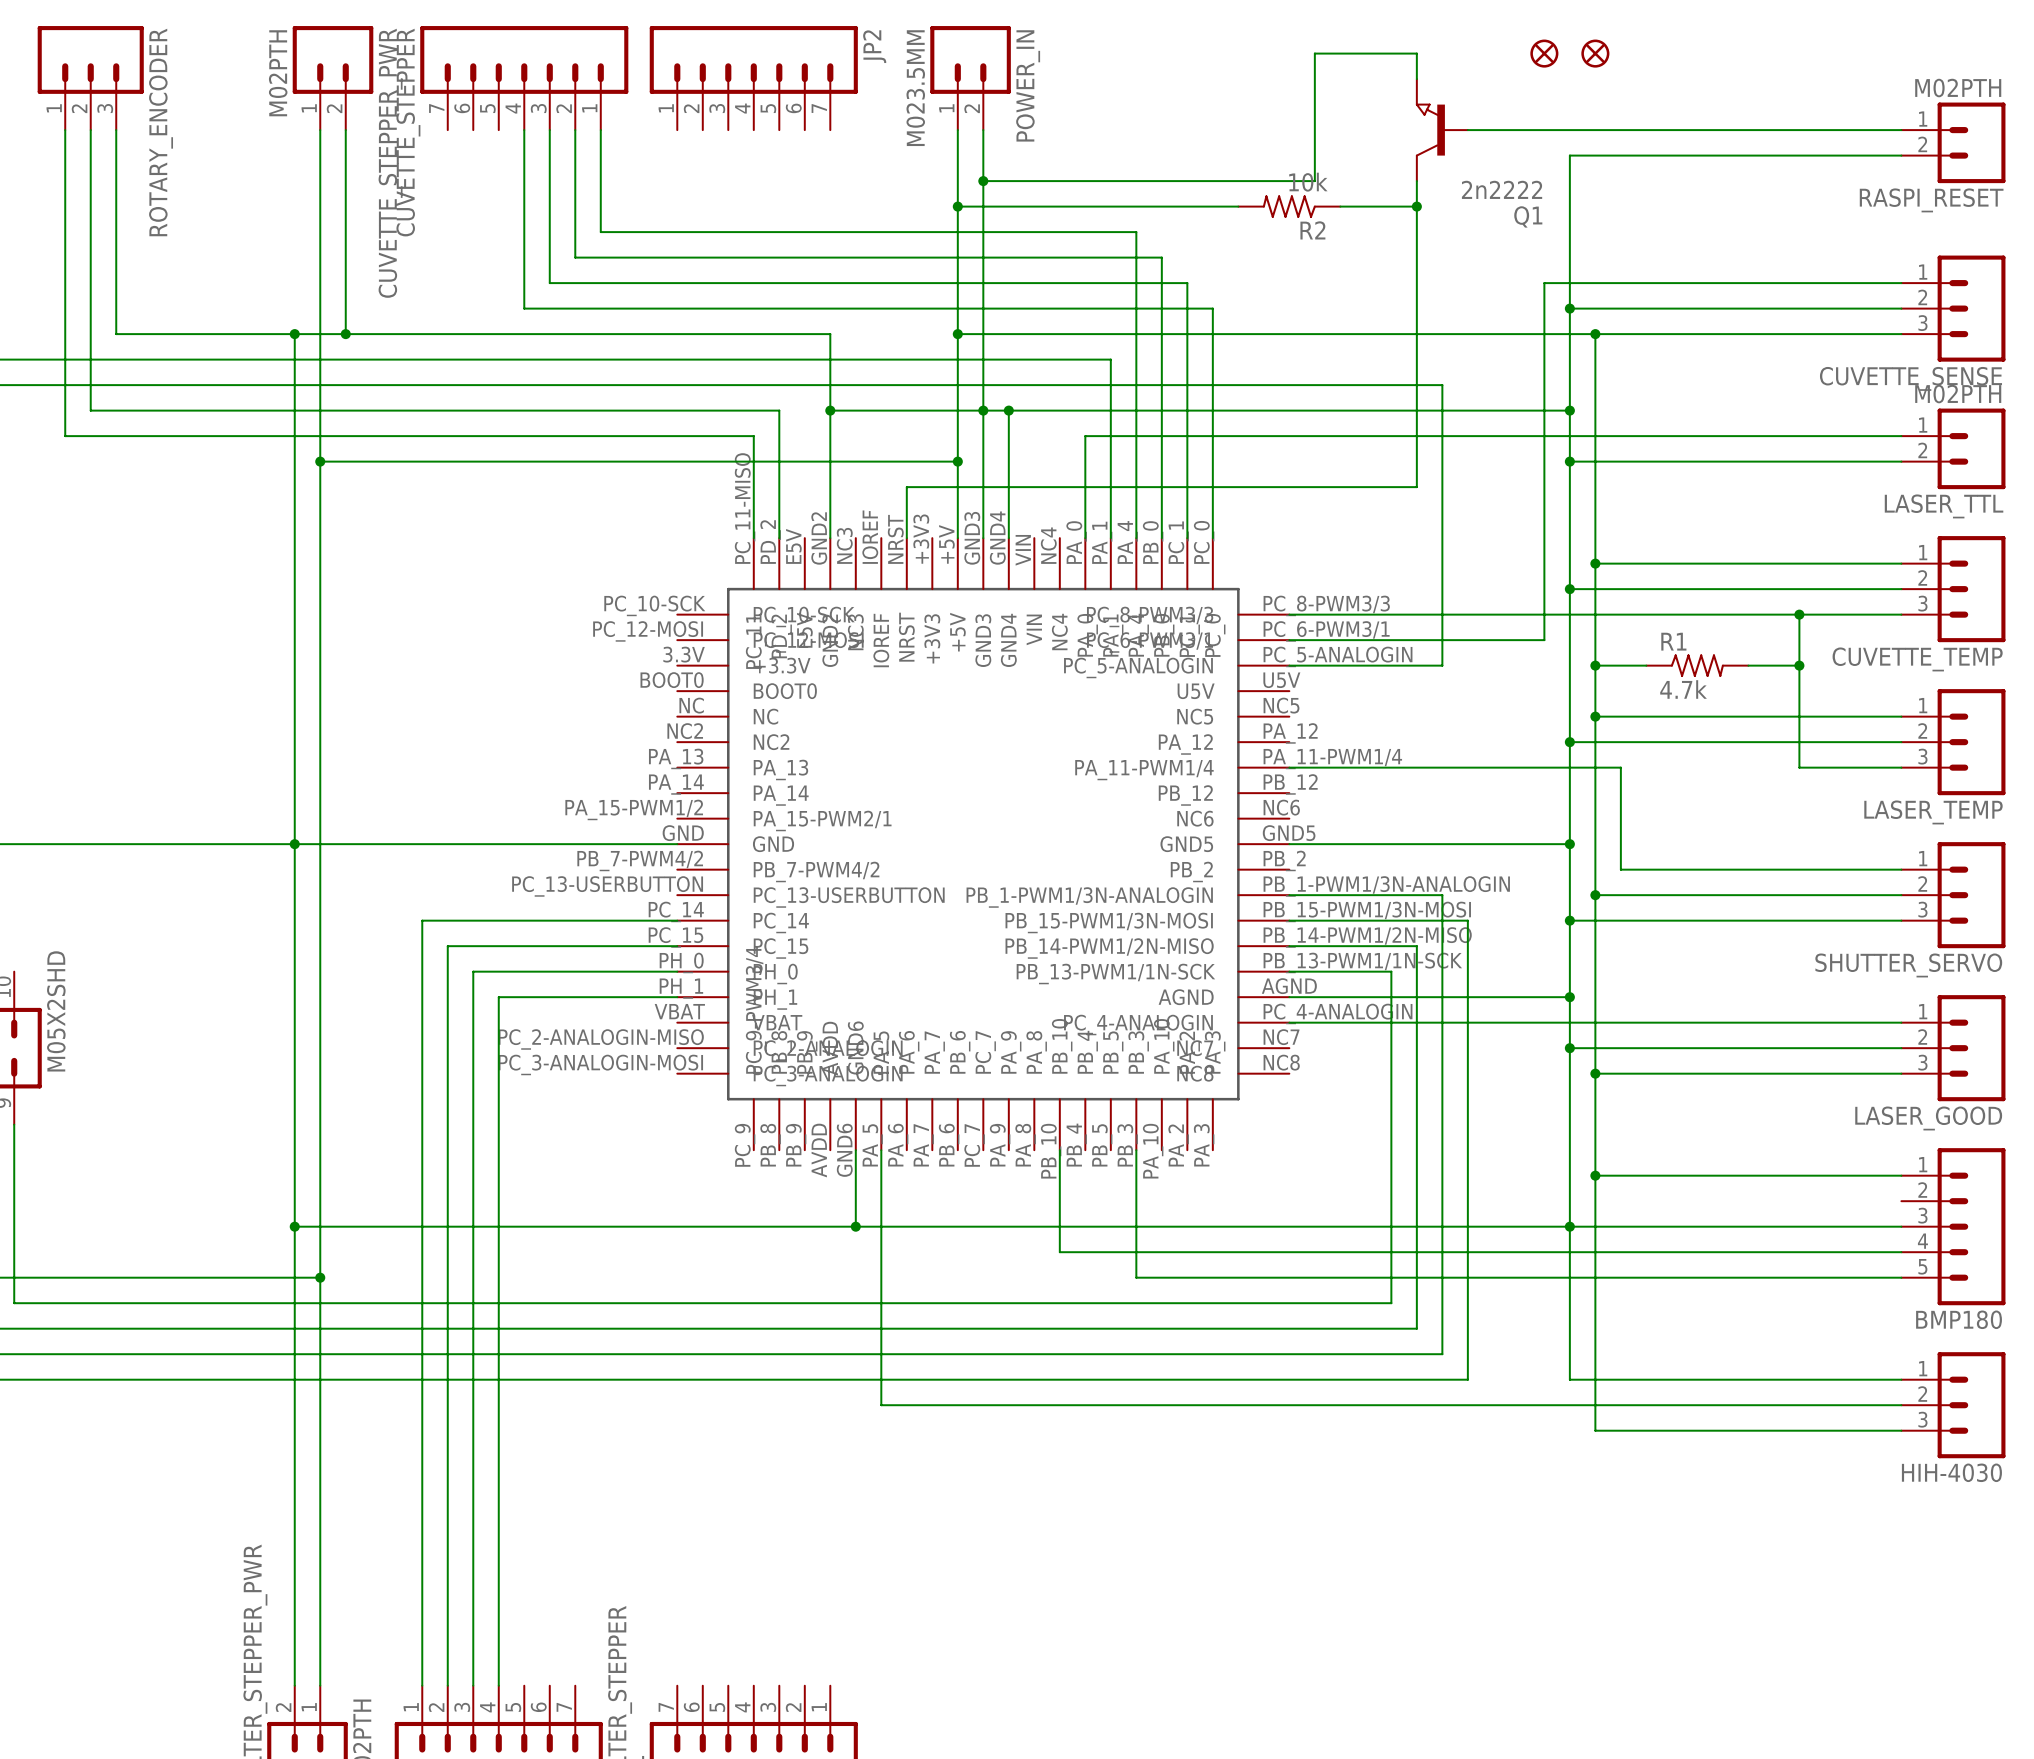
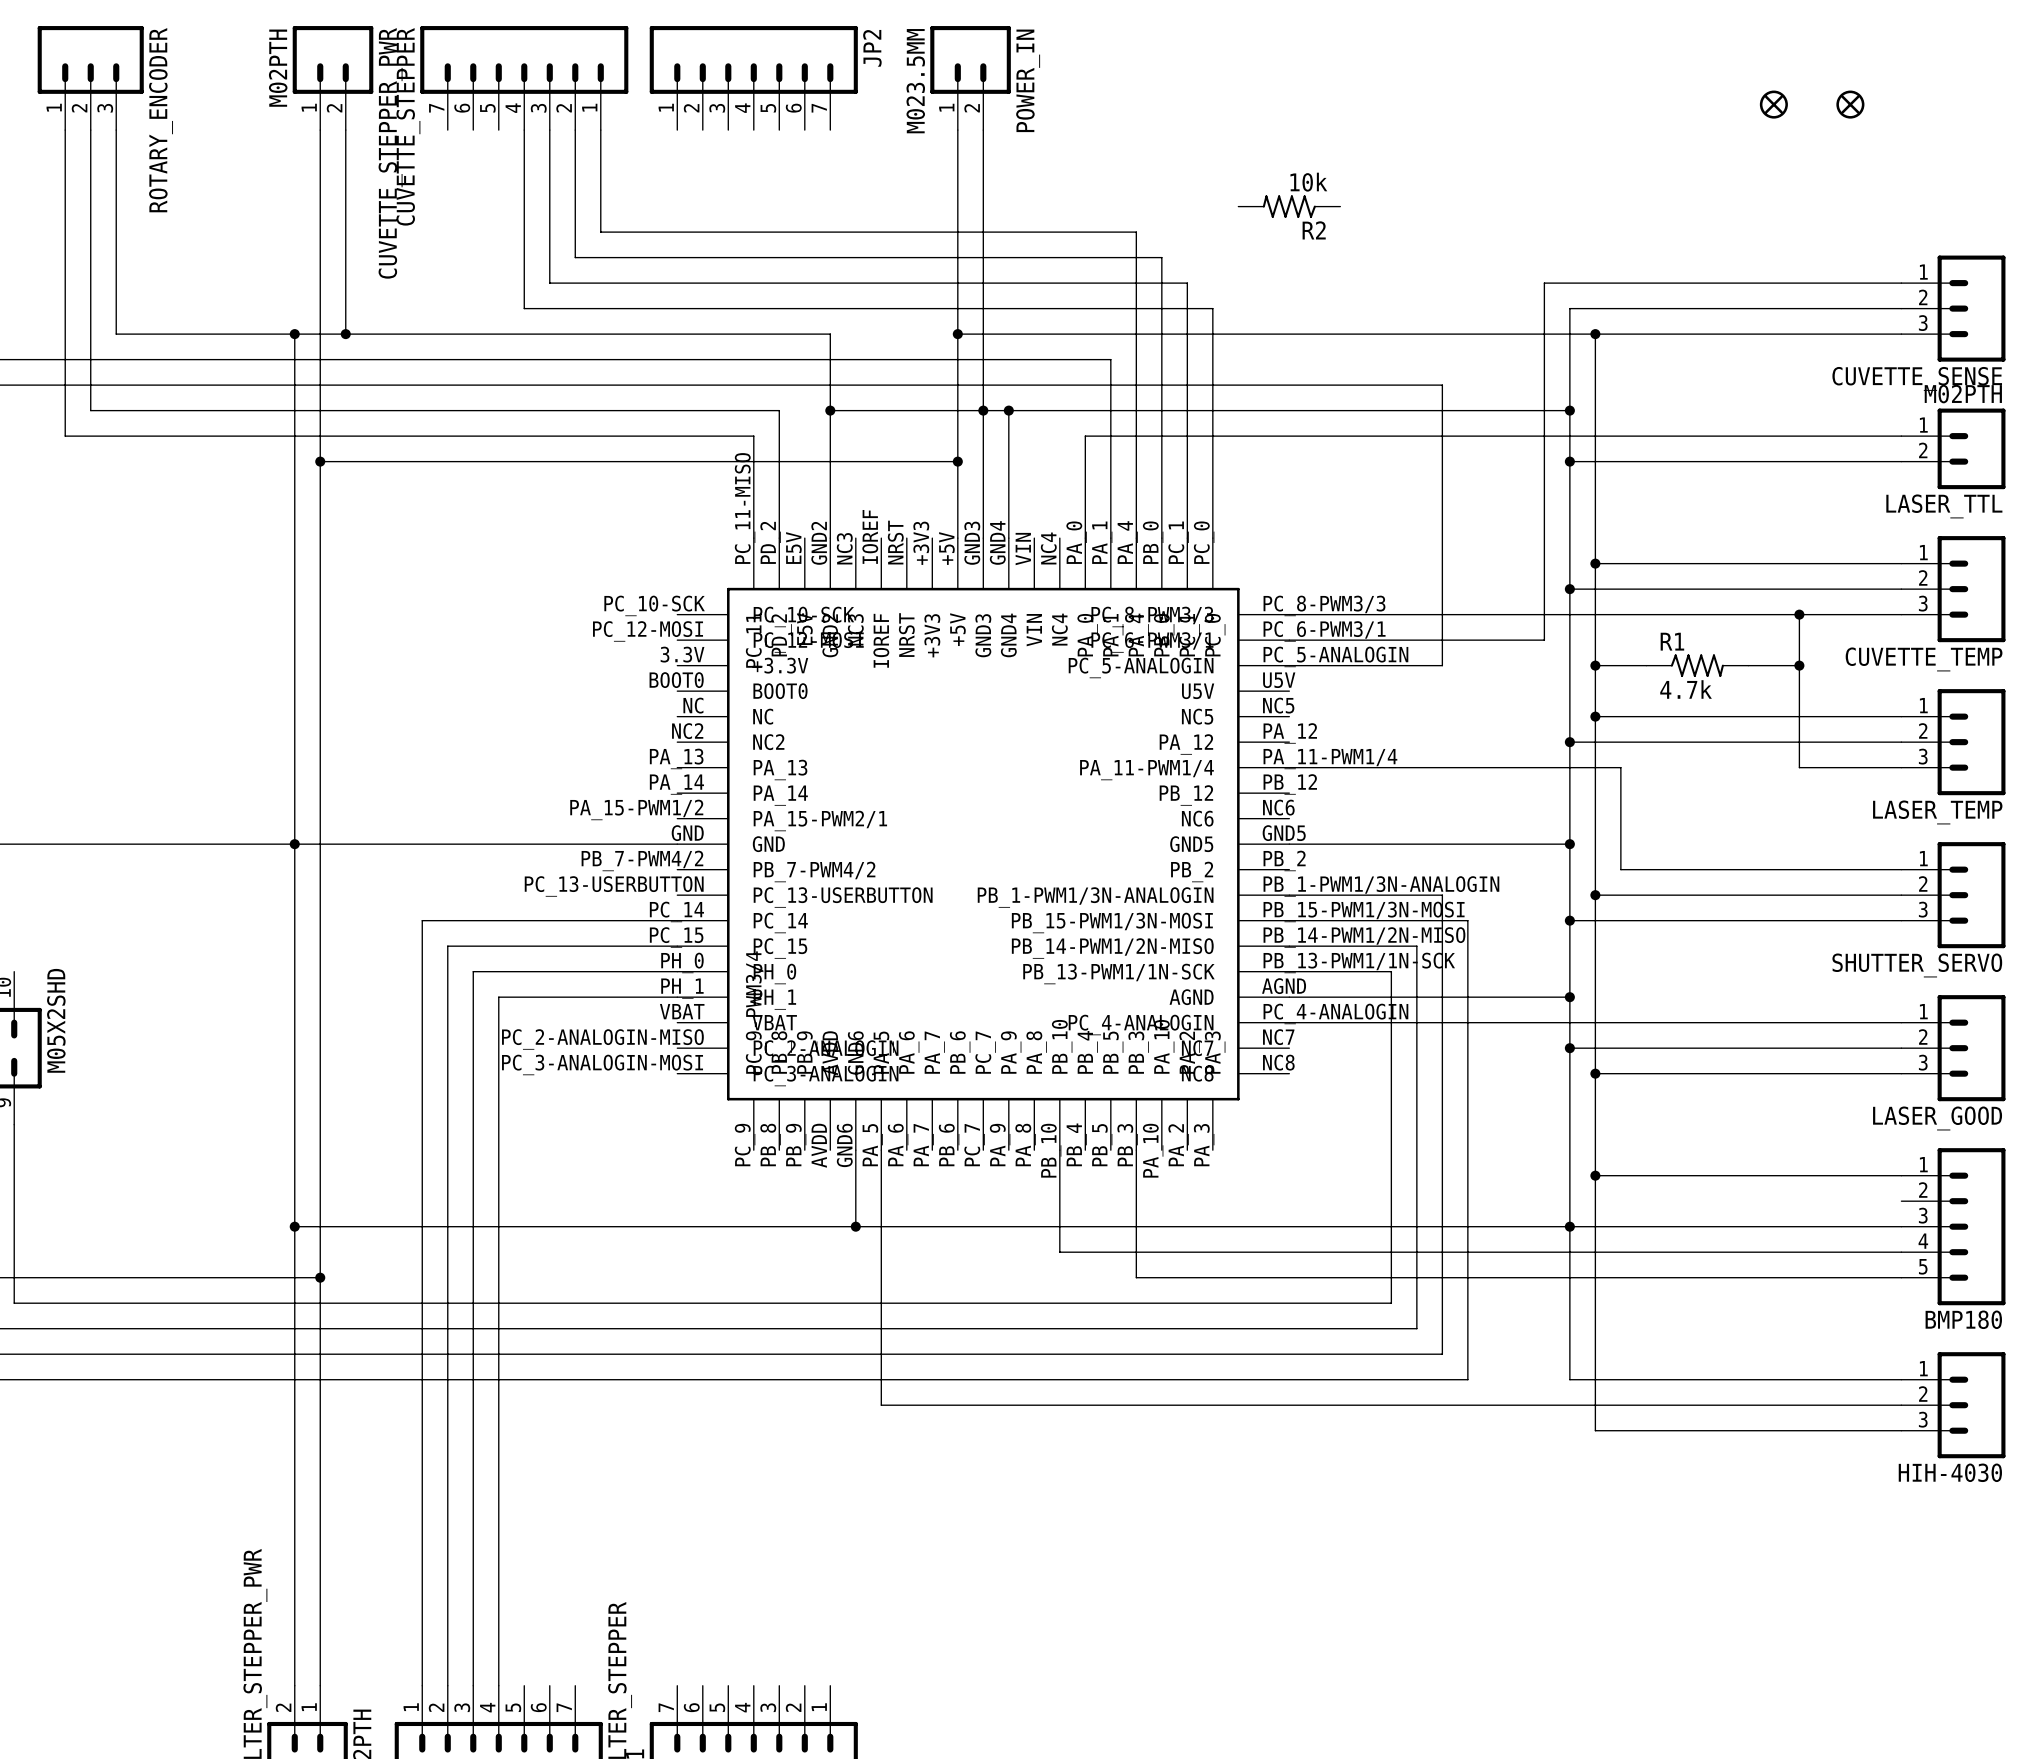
part: (1544, 53) -> none
part: (1595, 53) -> none
wire: (1416, 79) (1416, 53) (1314, 53) (1314, 181) (983, 181) -> none
part: none -> (1773, 104)
part: none -> (1850, 104)
Q1: 2n2222 (1441, 130) -> none
wire: (1467, 130) (1901, 130) -> none
RASPI_RESET: M02PTH (1953, 142) -> none
wire: (1901, 155) (1569, 155) (1569, 308) -> none
junction: (983, 181) -> none
wire: (1416, 181) (1416, 487) (906, 487) (906, 538) -> none
wire: (957, 206) (1238, 206) -> none
junction: (957, 206) -> none
wire: (1340, 206) (1416, 206) -> none
junction: (1416, 206) -> none
junction: (1569, 308) -> none

